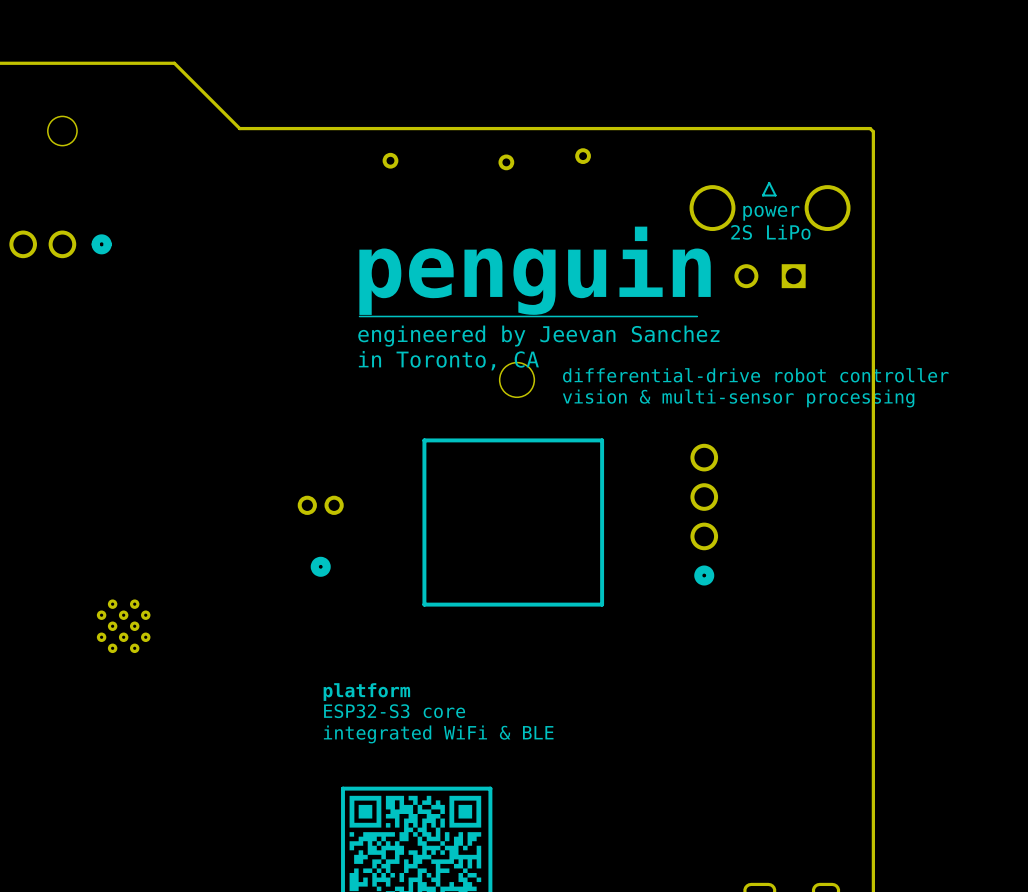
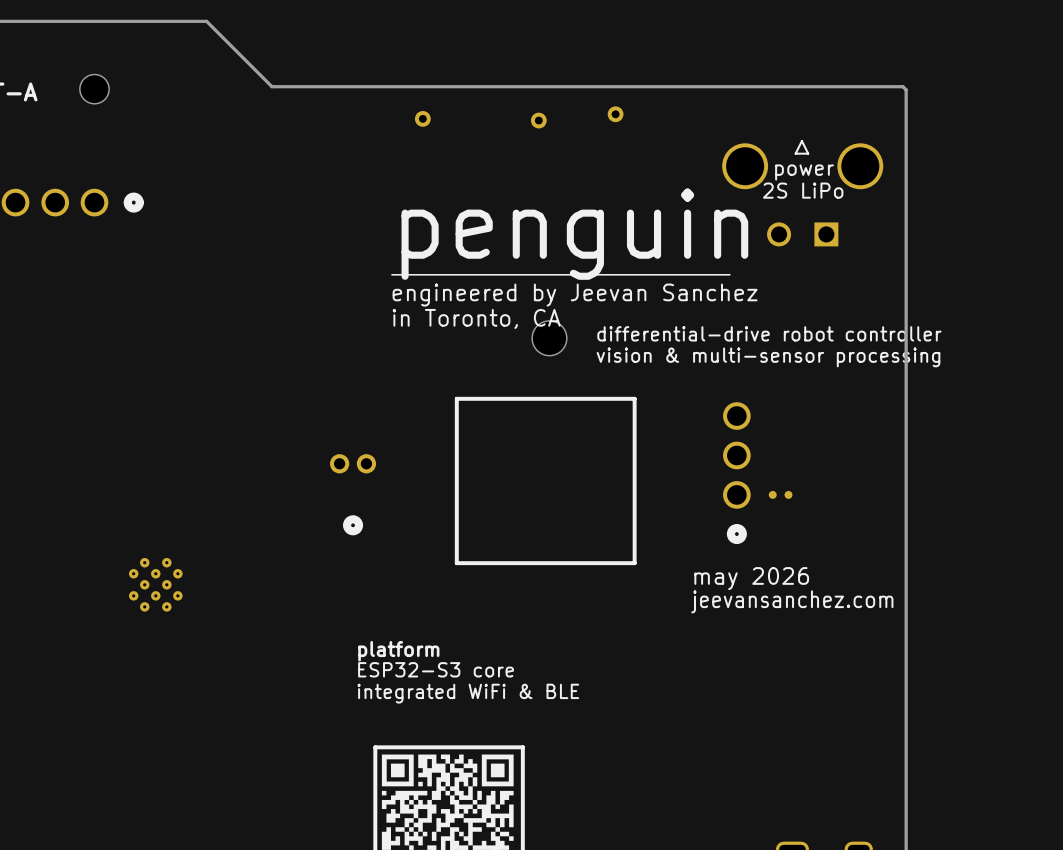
part: none -> (780, 494)
text: none -> may 2026 (751, 578)
text: none -> jeevansanchez.com (792, 601)

